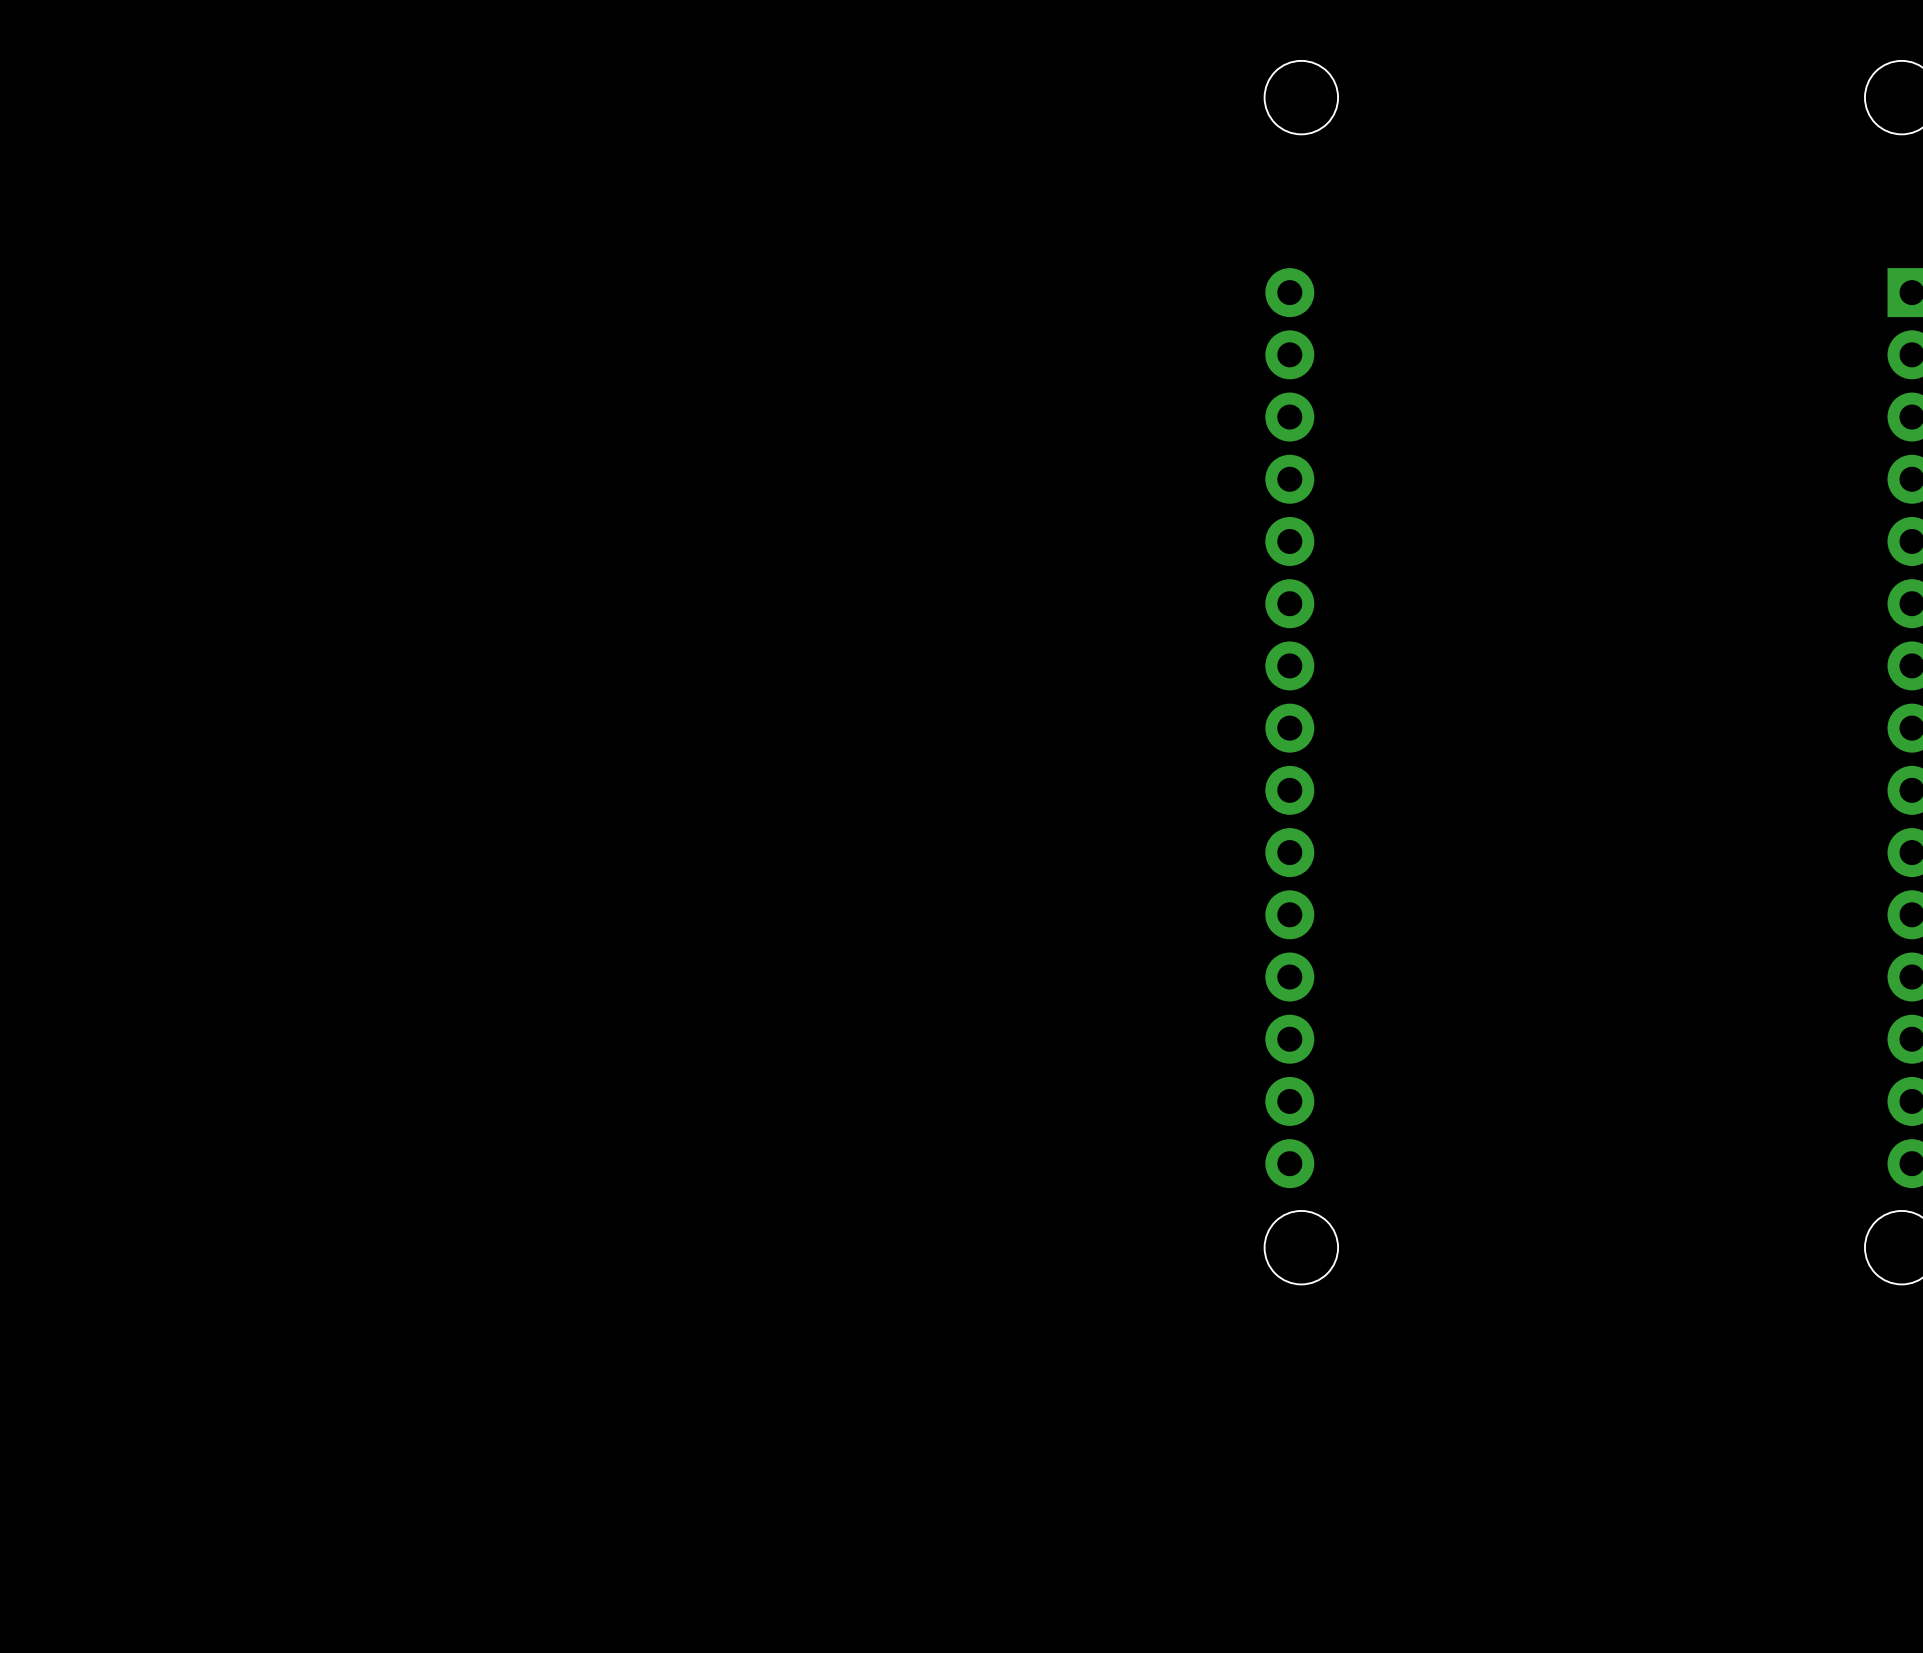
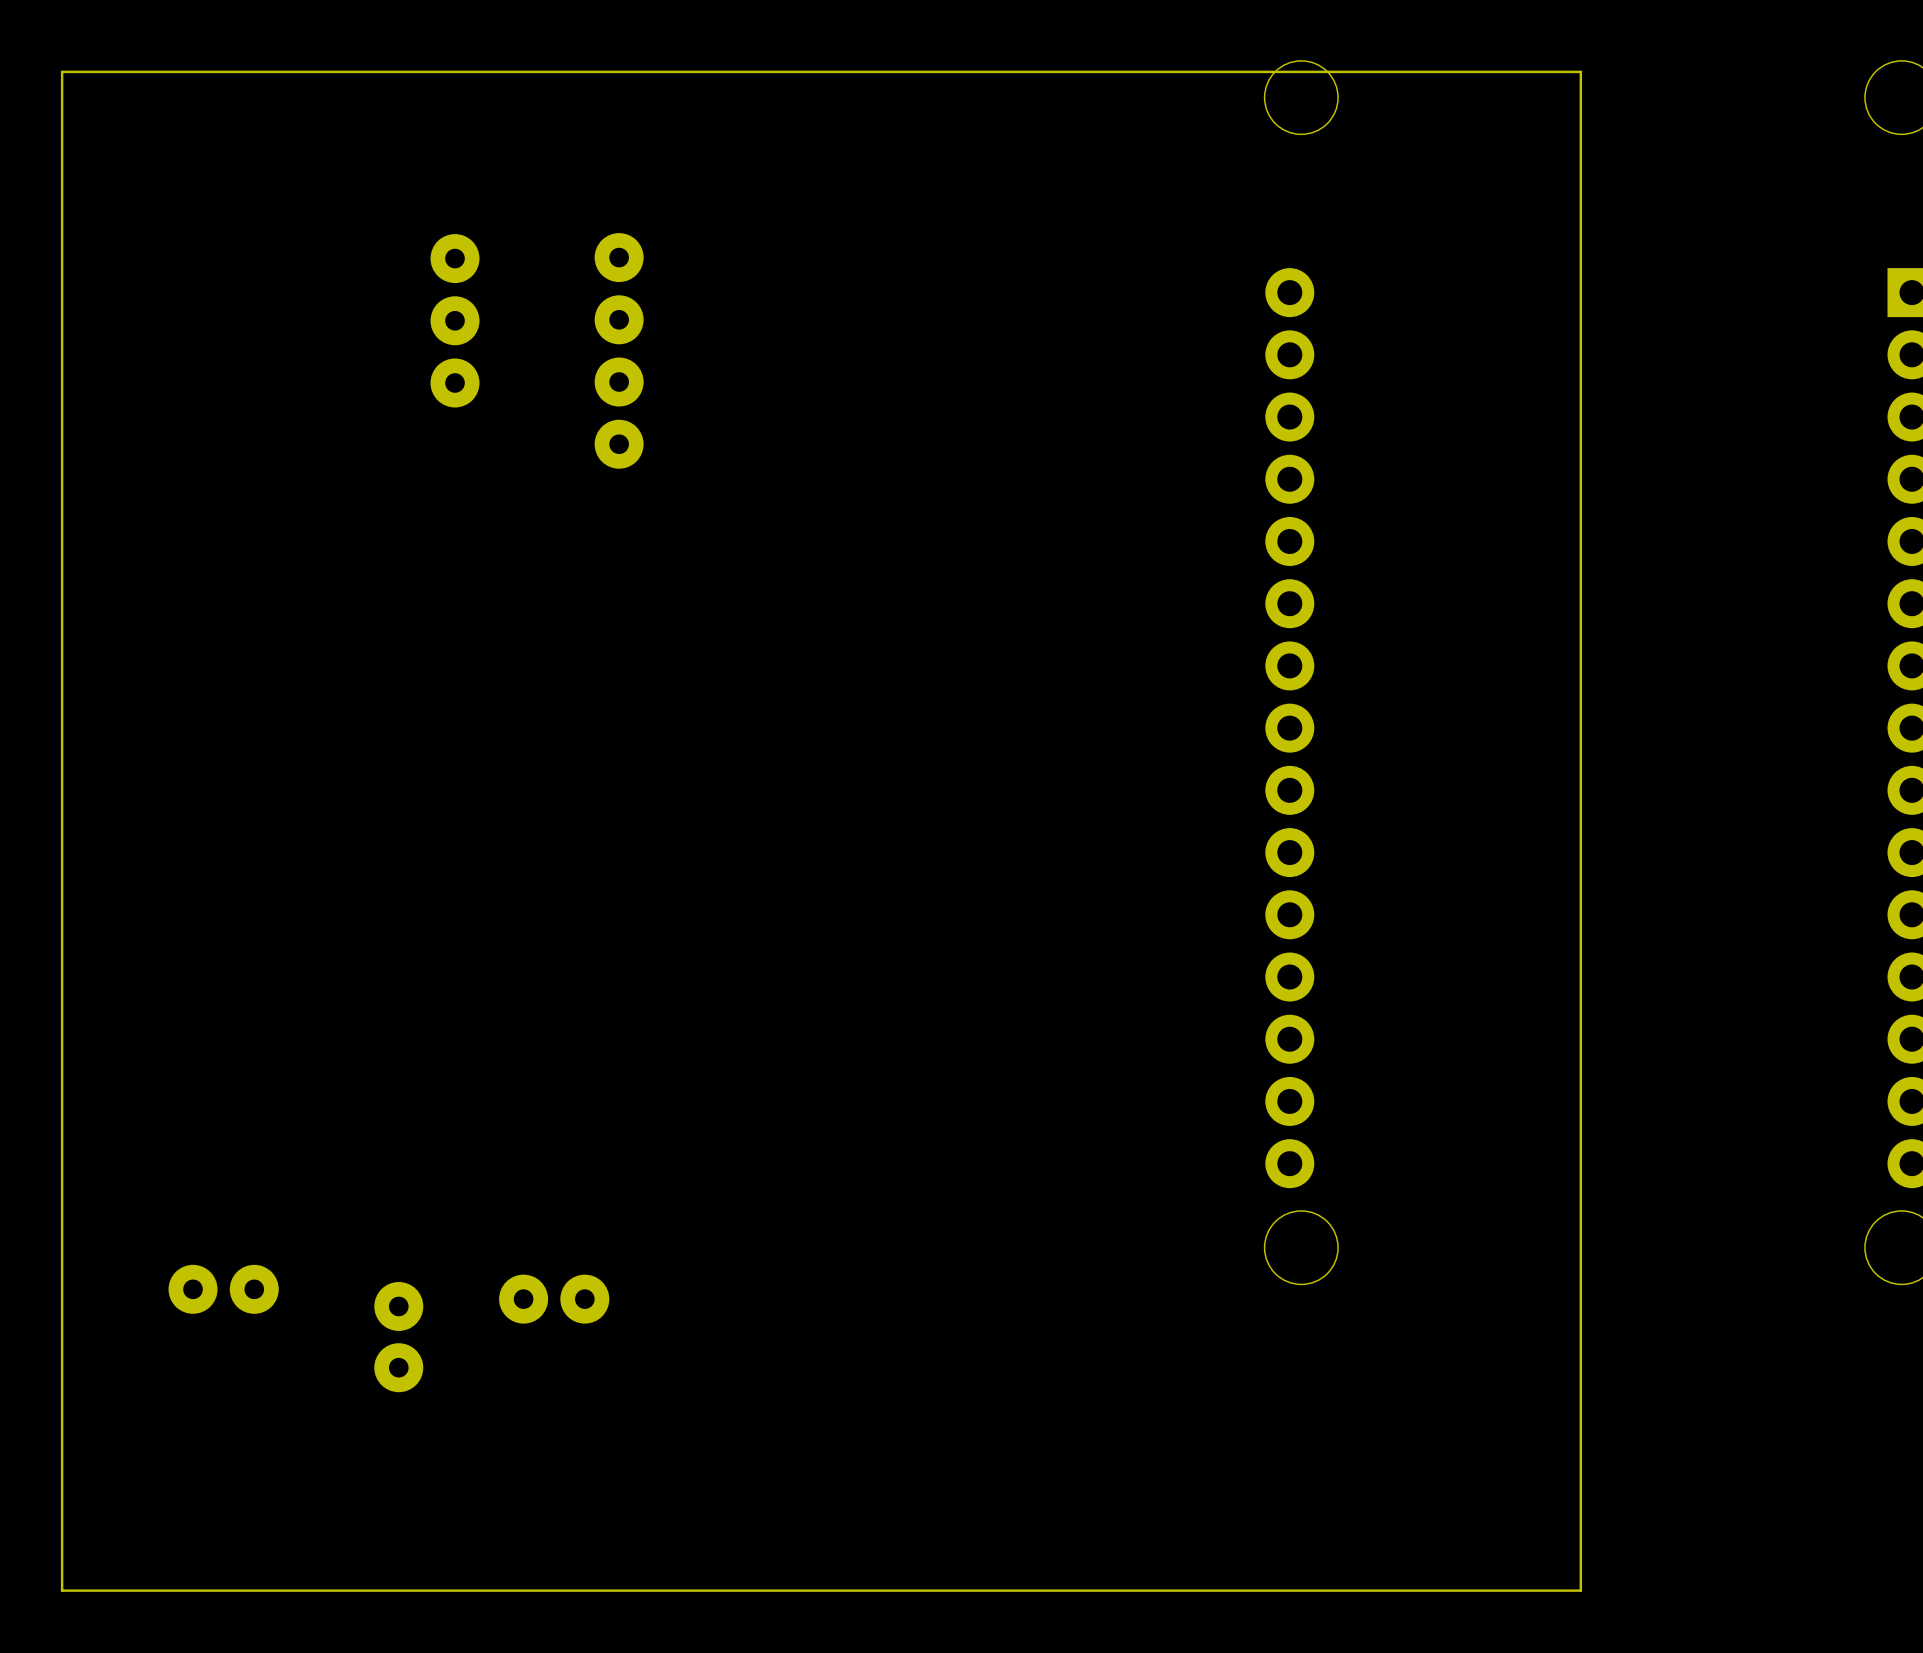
board edge: none -> (1580, 71) (1580, 1590) (62, 1590) (62, 71) (1580, 71)
part: none -> (455, 320)
part: none -> (619, 350)
part: none -> (223, 1289)
part: none -> (554, 1299)
part: none -> (398, 1337)

